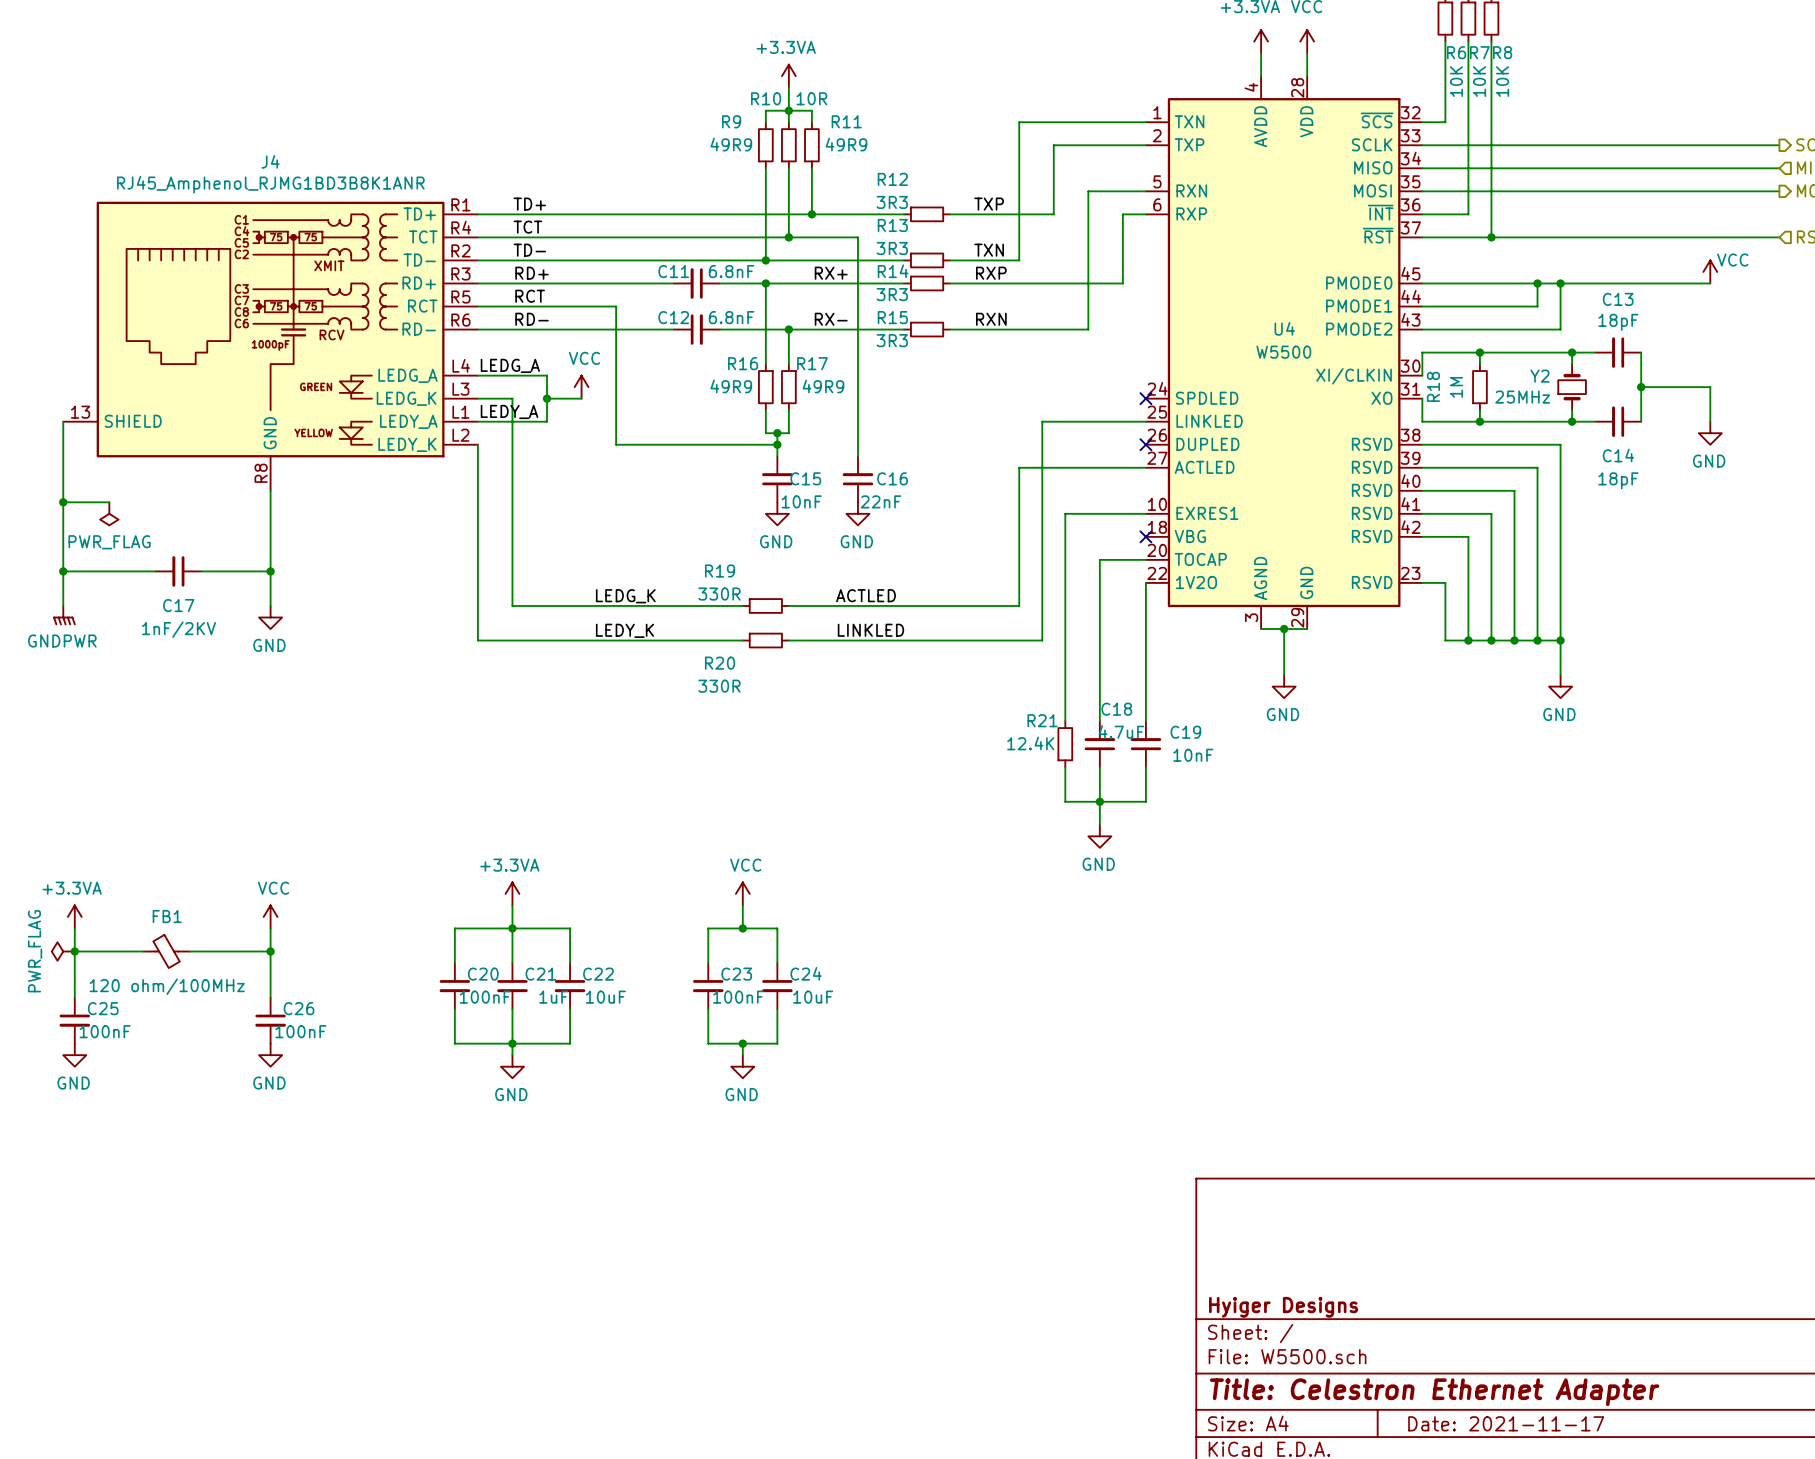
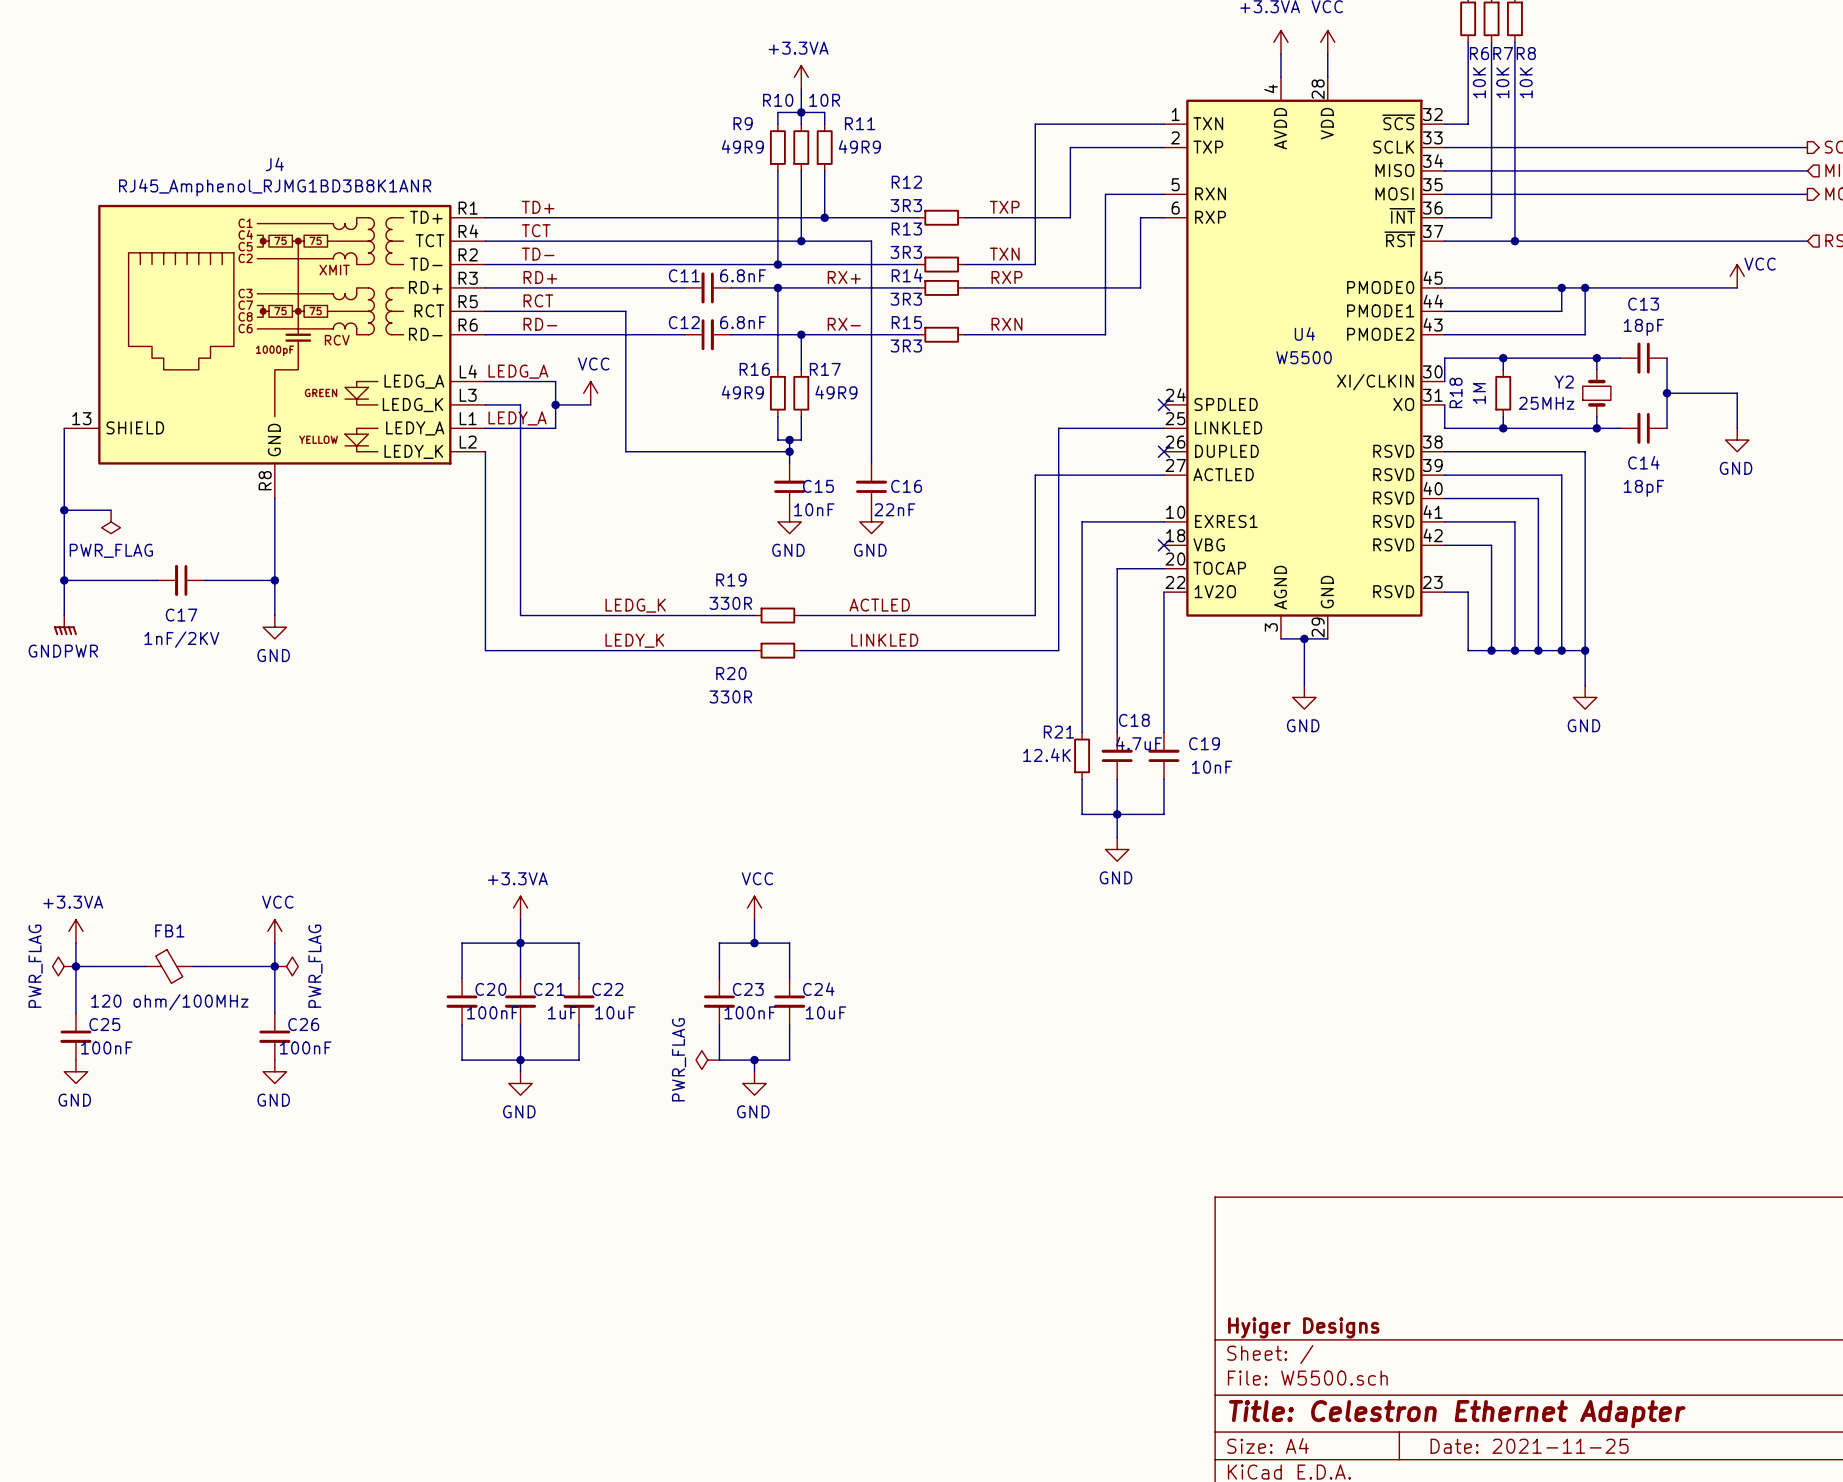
power symbol: none -> PWR_FLAG (286, 966)
power symbol: none -> PWR_FLAG (707, 1060)
title block: Date: 2021-11-17 (1506, 1423) -> Date: 2021-11-25 (1529, 1446)

